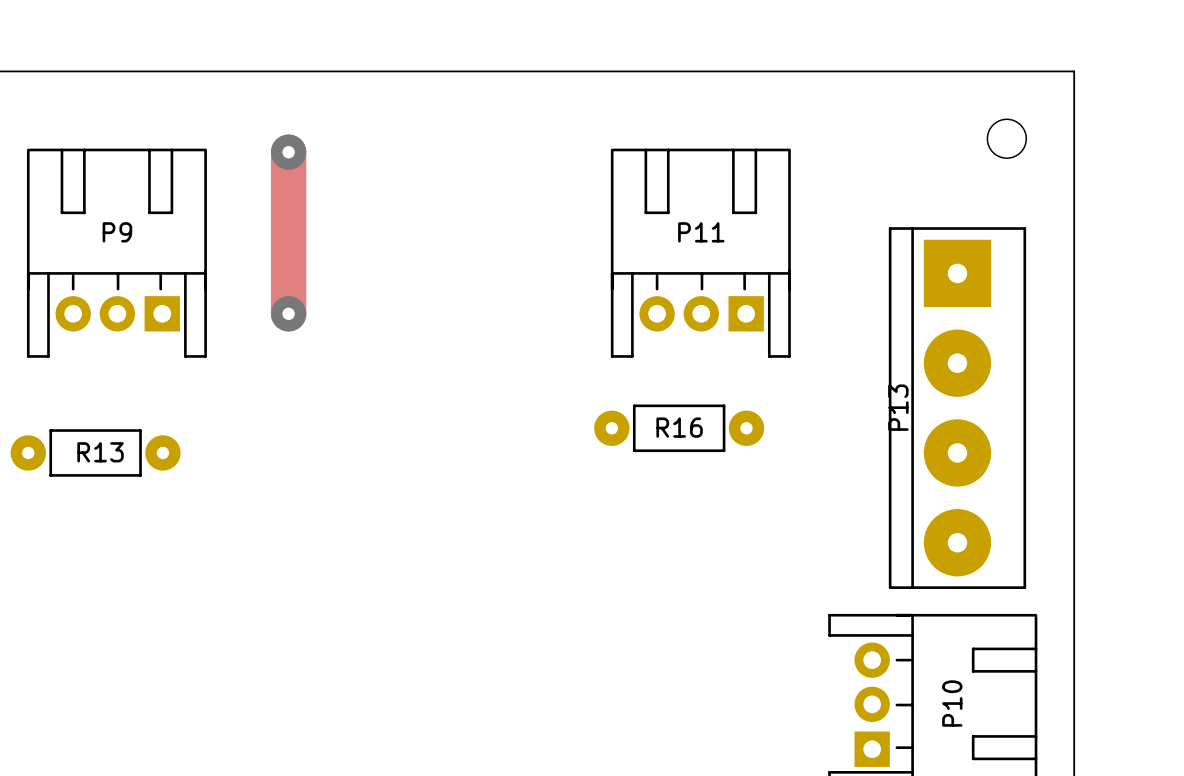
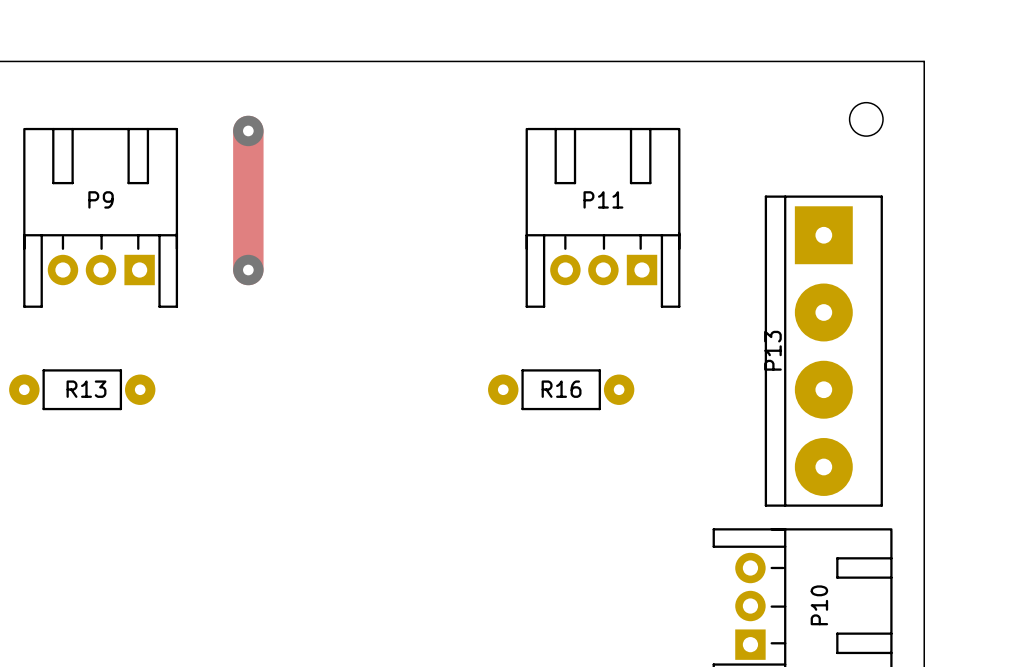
R16 position: (679, 428) -> (561, 389)

